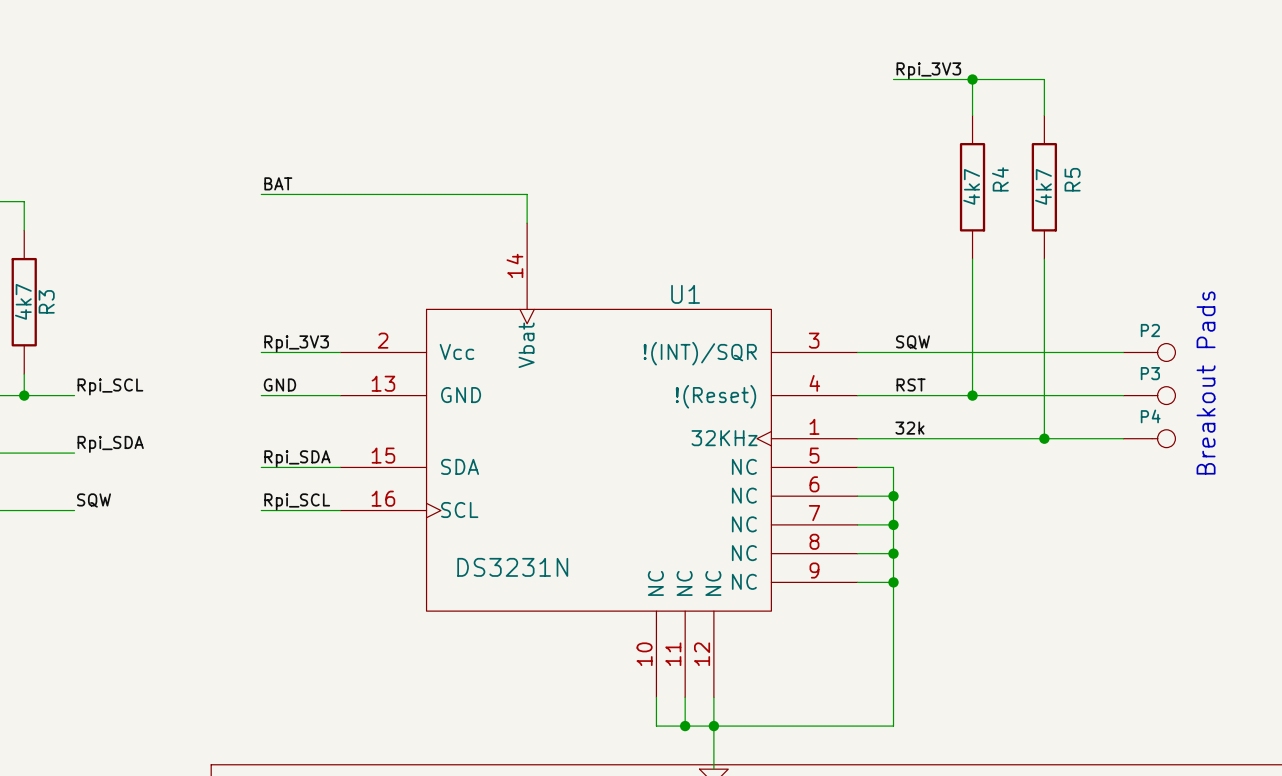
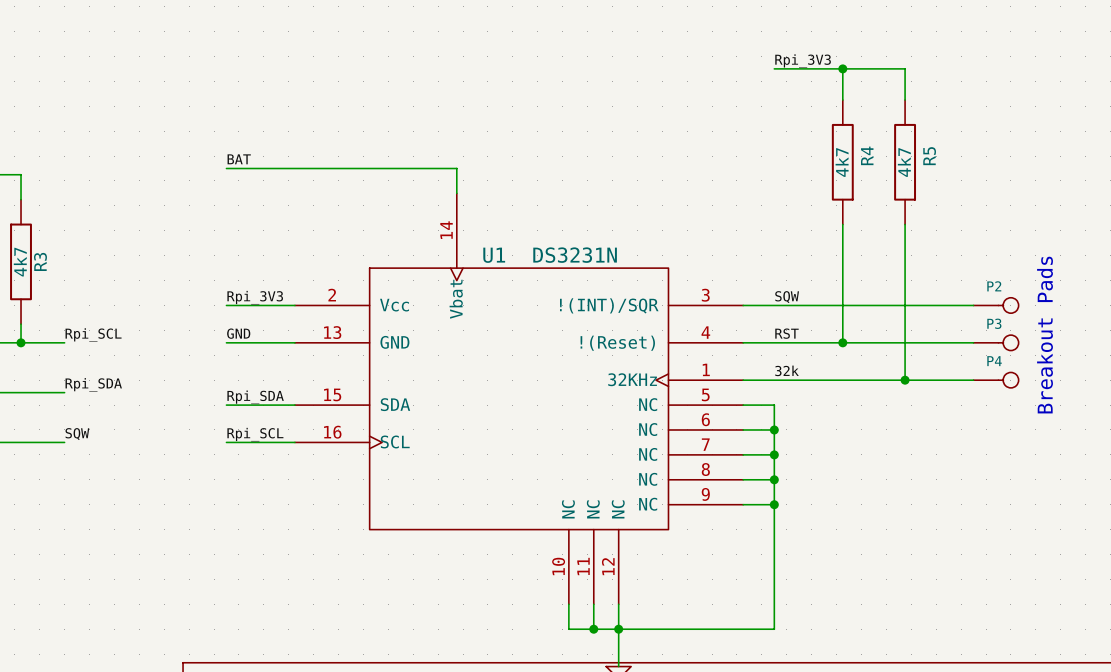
U1 name position: U1 (685, 294) -> U1 (494, 255)
U1 value position: DS3231N (512, 567) -> DS3231N (575, 255)

